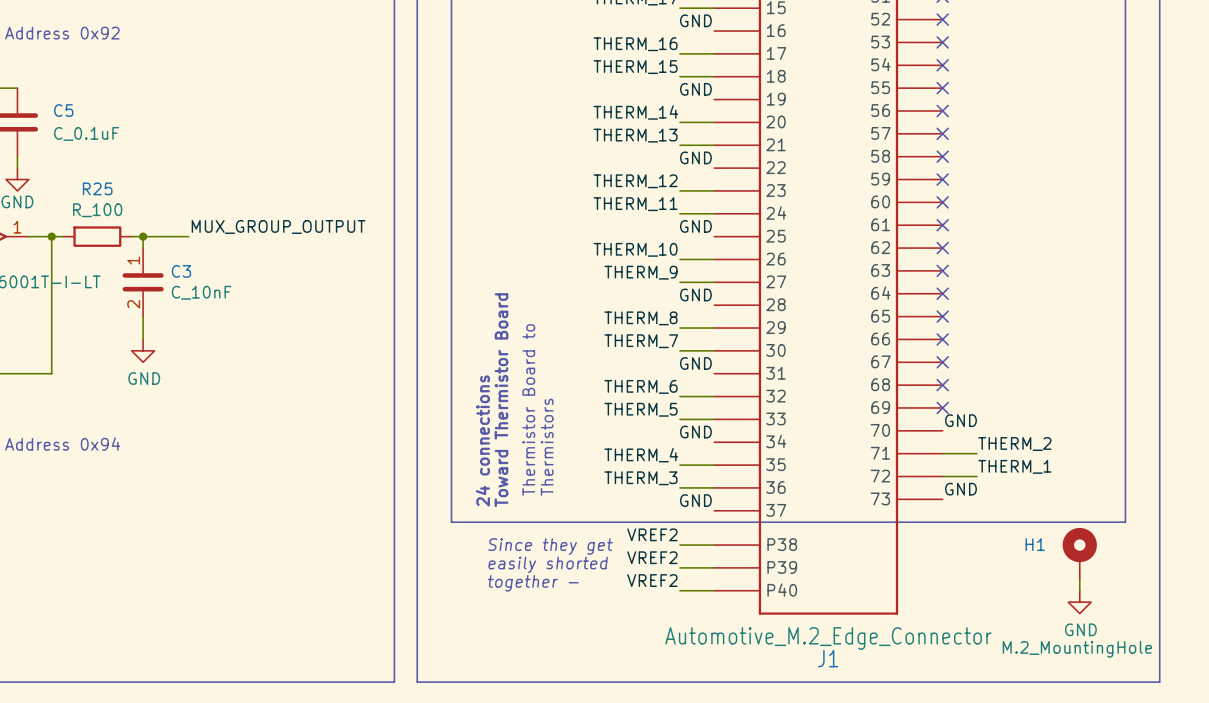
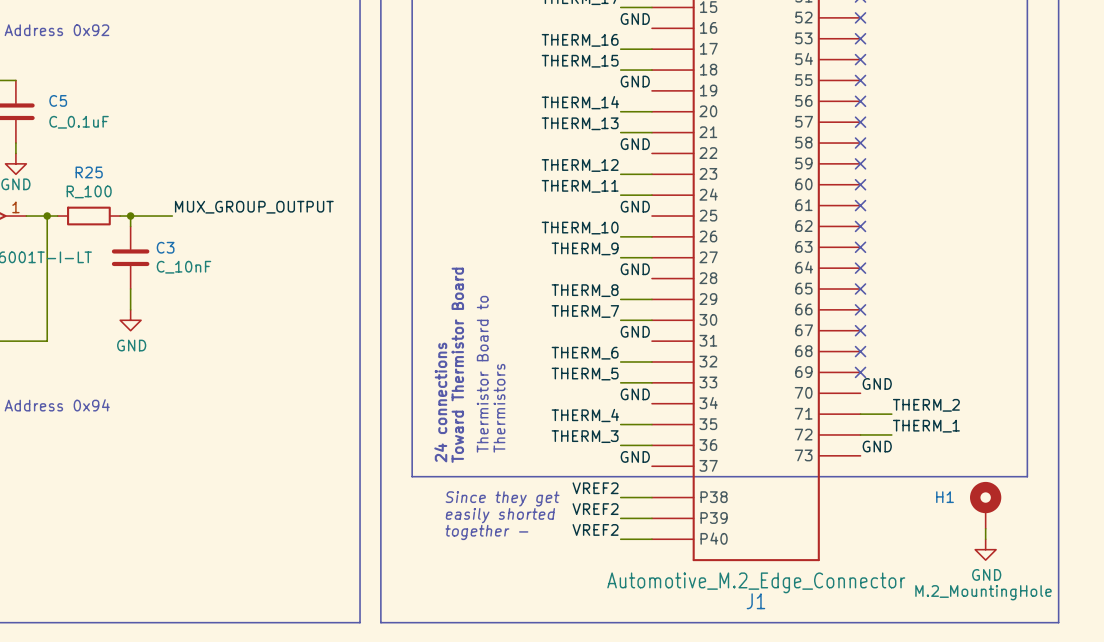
C3 pin number: 1 (133, 260) -> none
C3 pin number: 2 (133, 304) -> none

